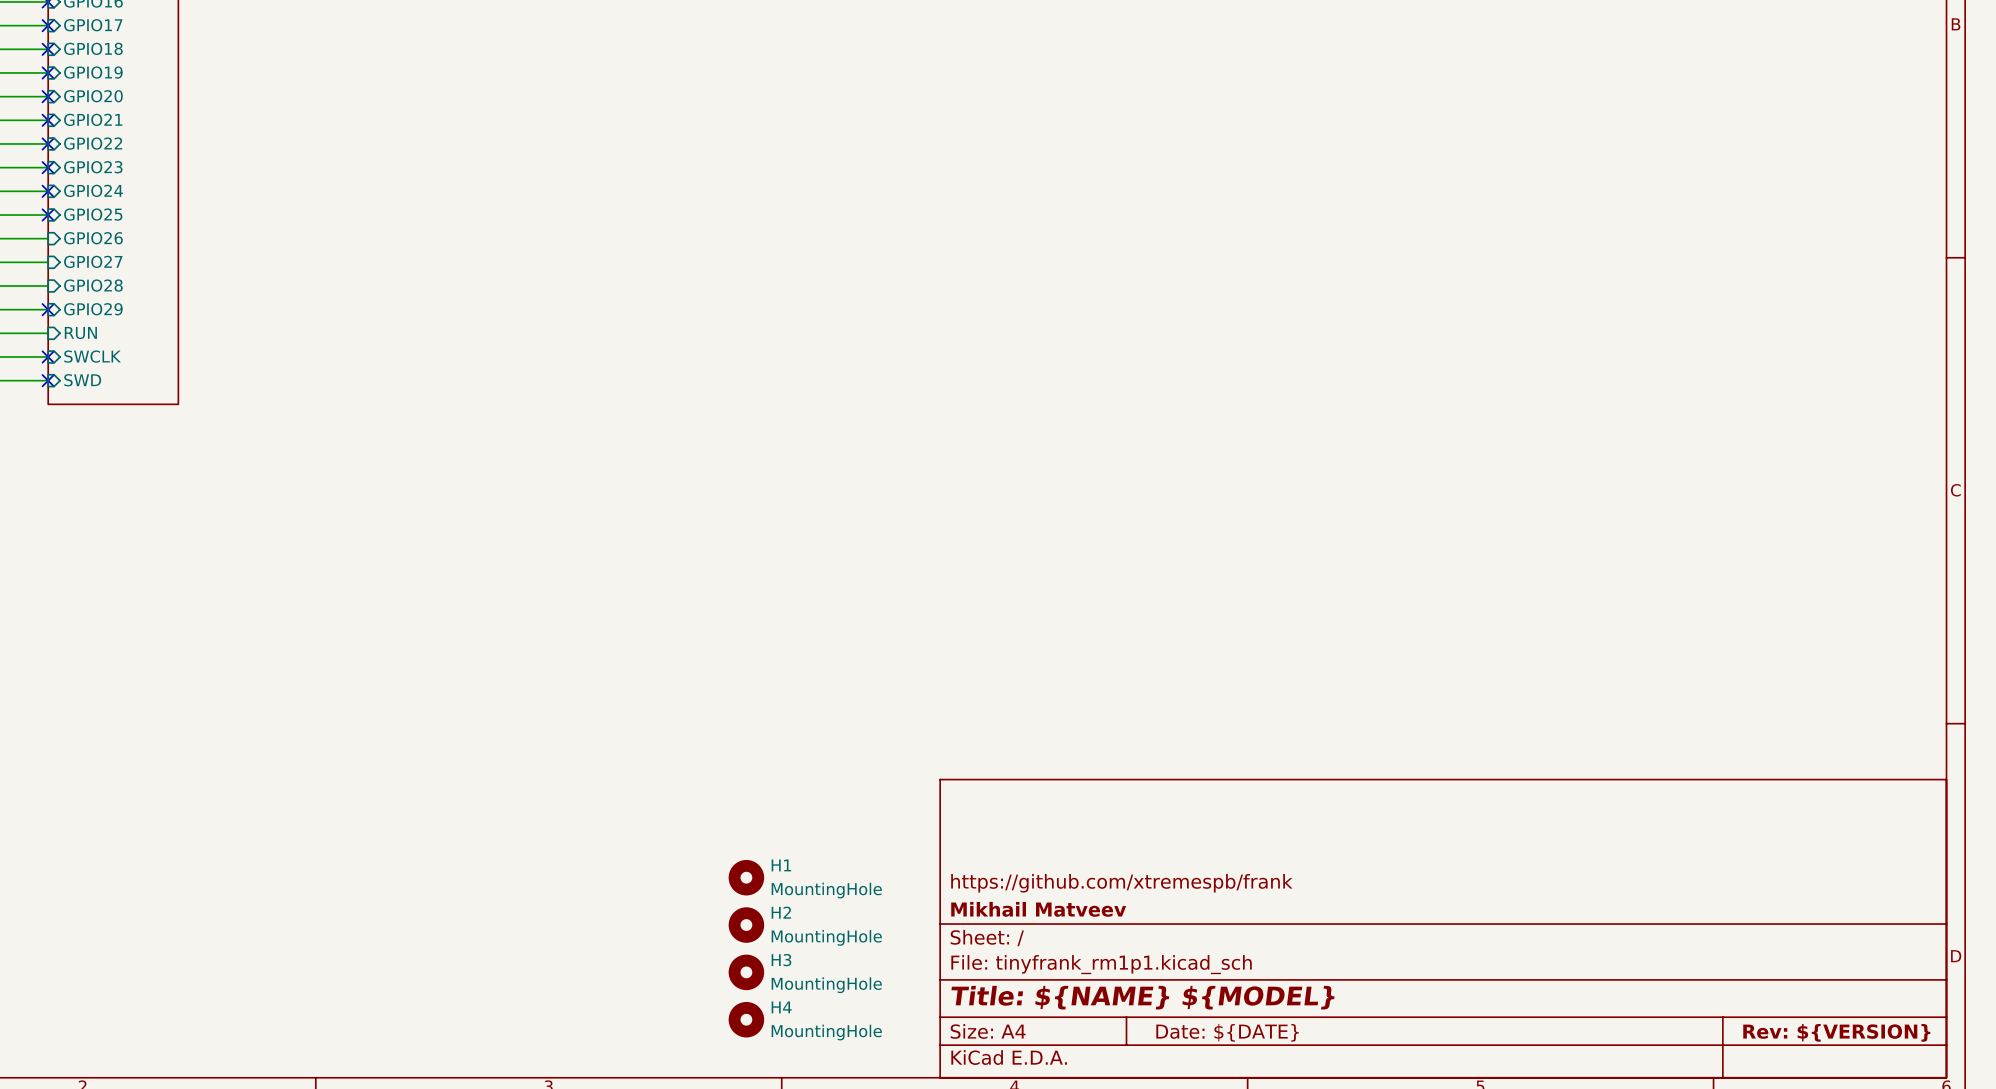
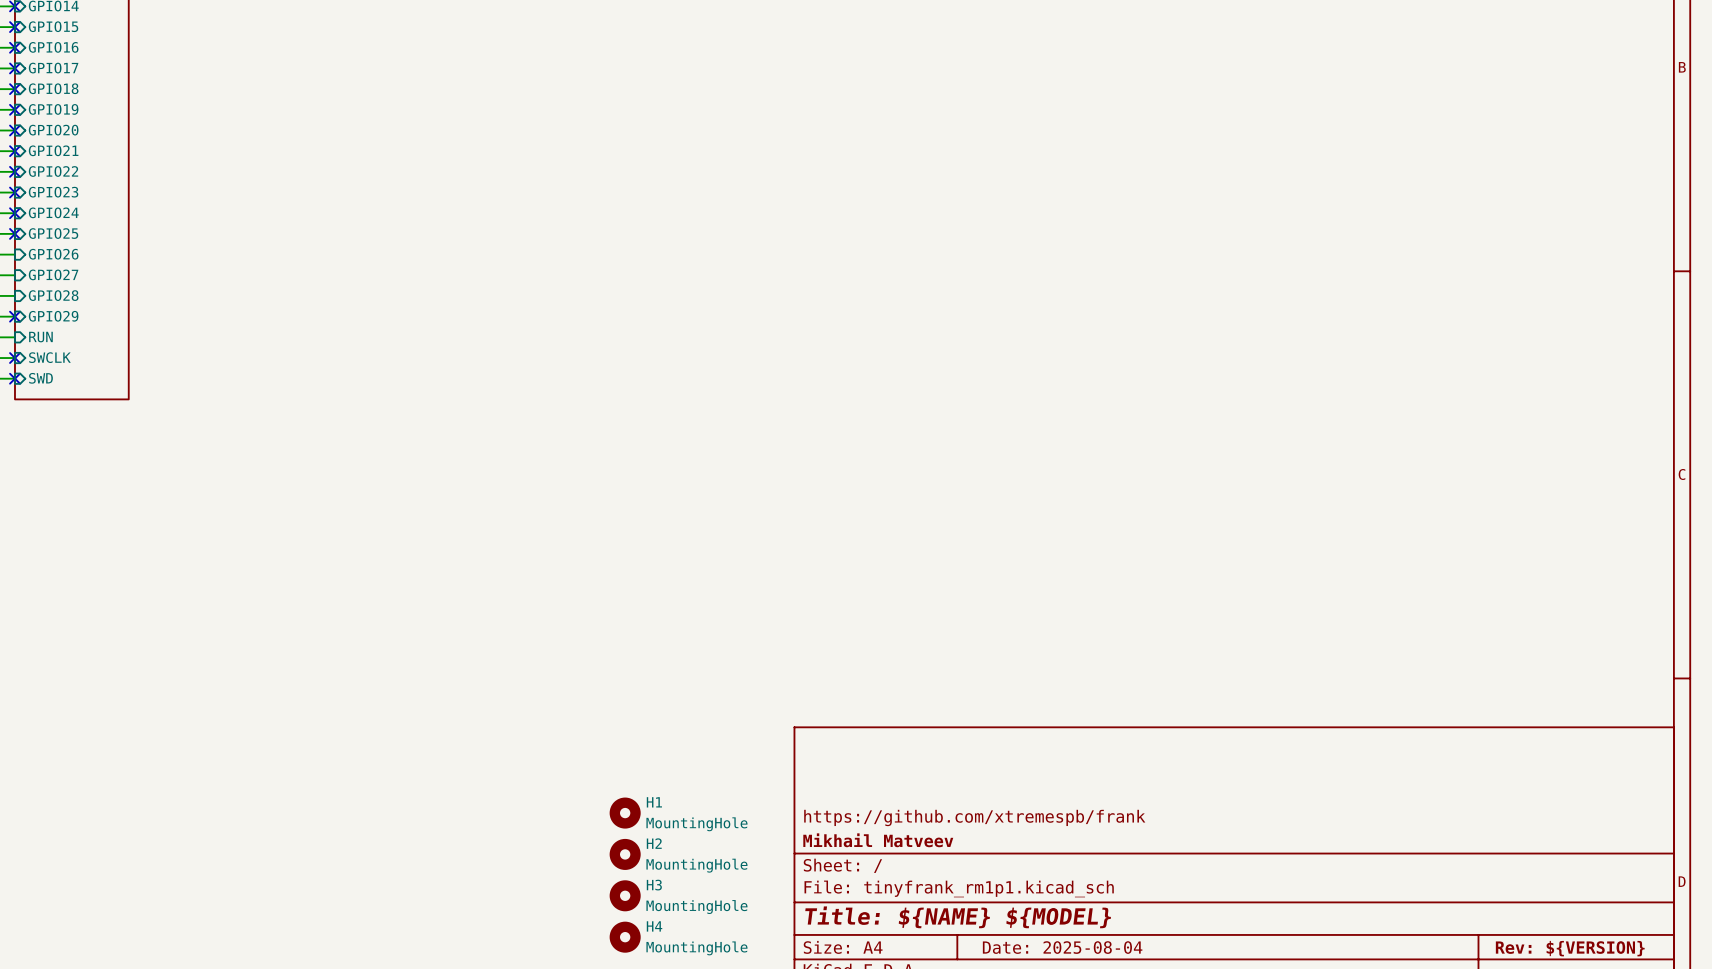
title block: Date: ${DATE} (1227, 1032) -> Date: 2025-08-04 (1062, 947)

